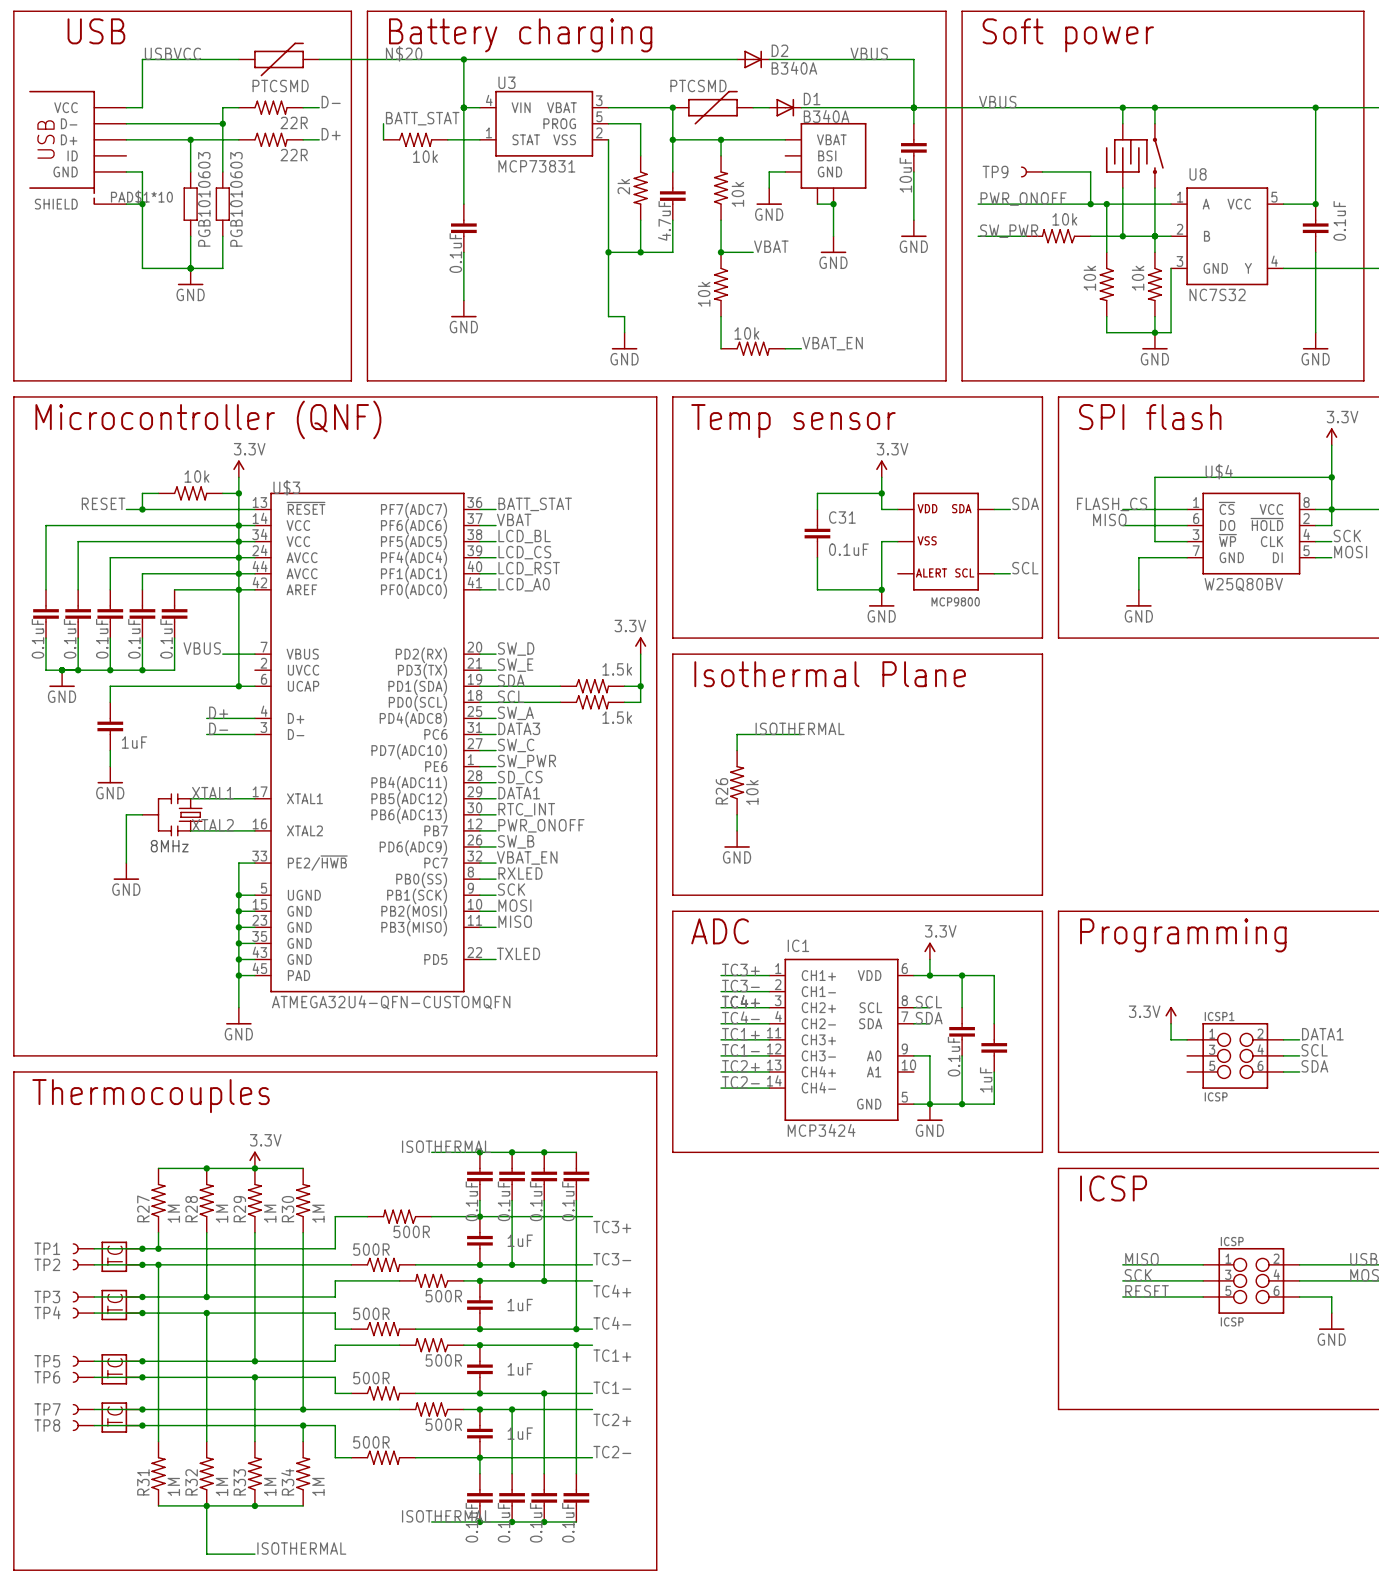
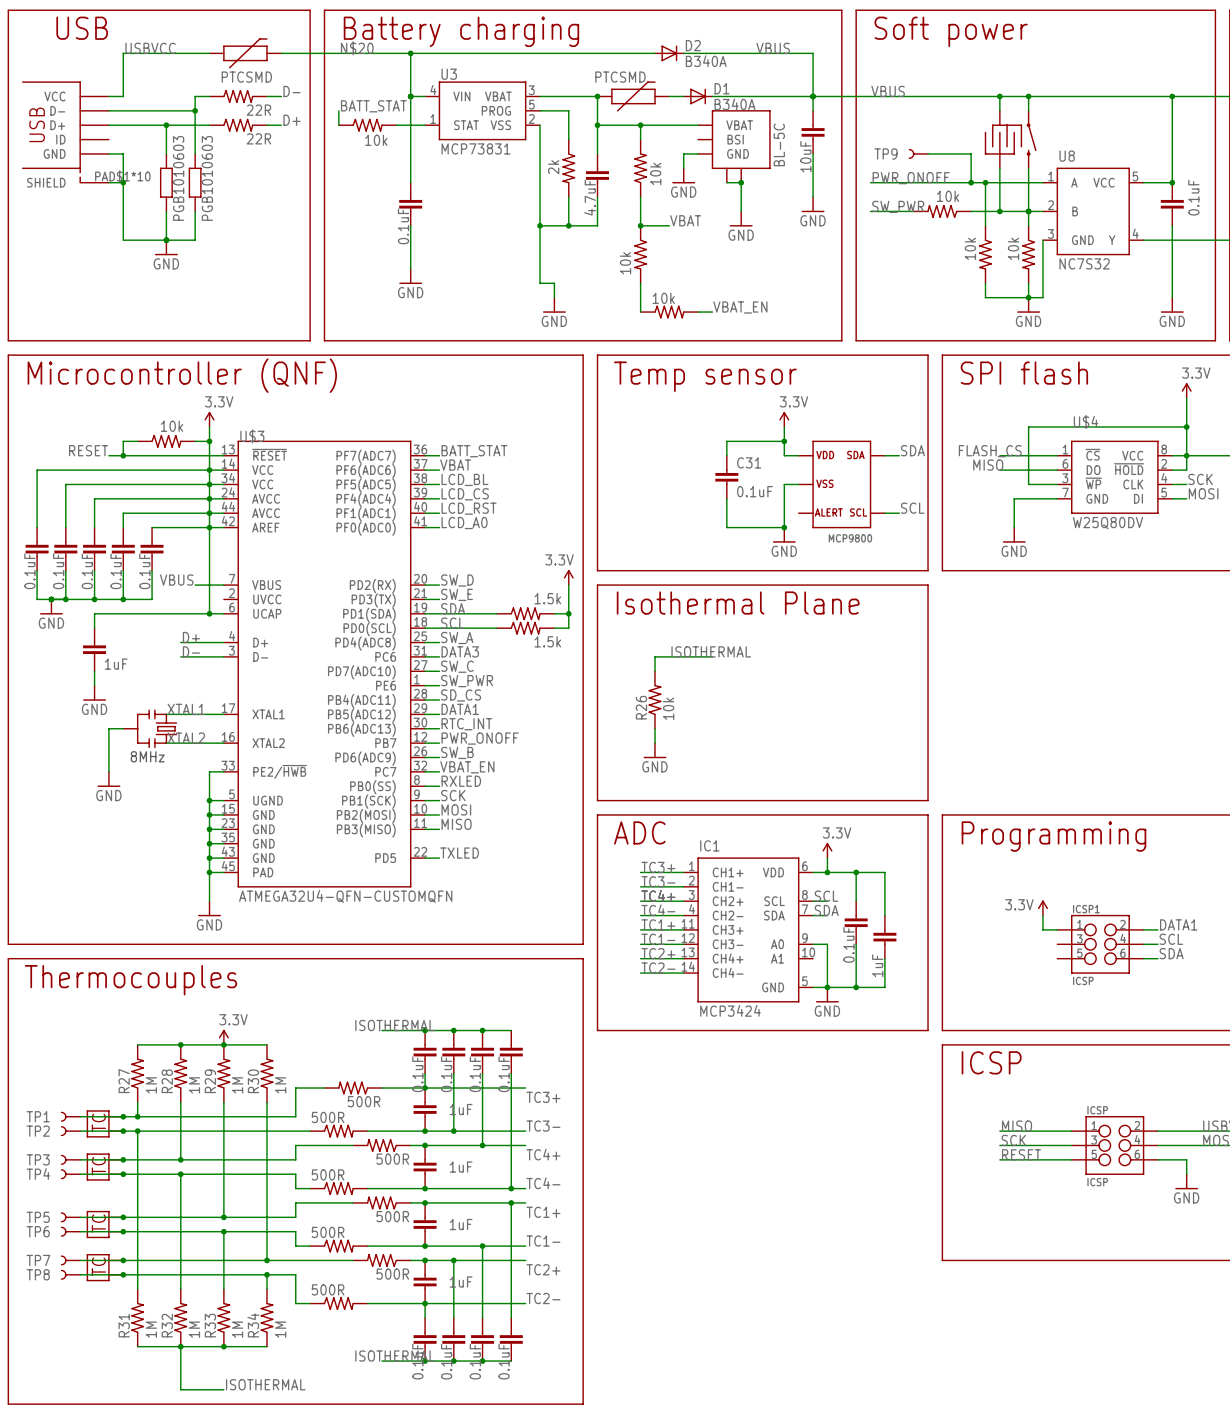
part: none -> (779, 144)
U$4 value: W25Q80BV (1243, 584) -> W25Q80DV (1108, 523)

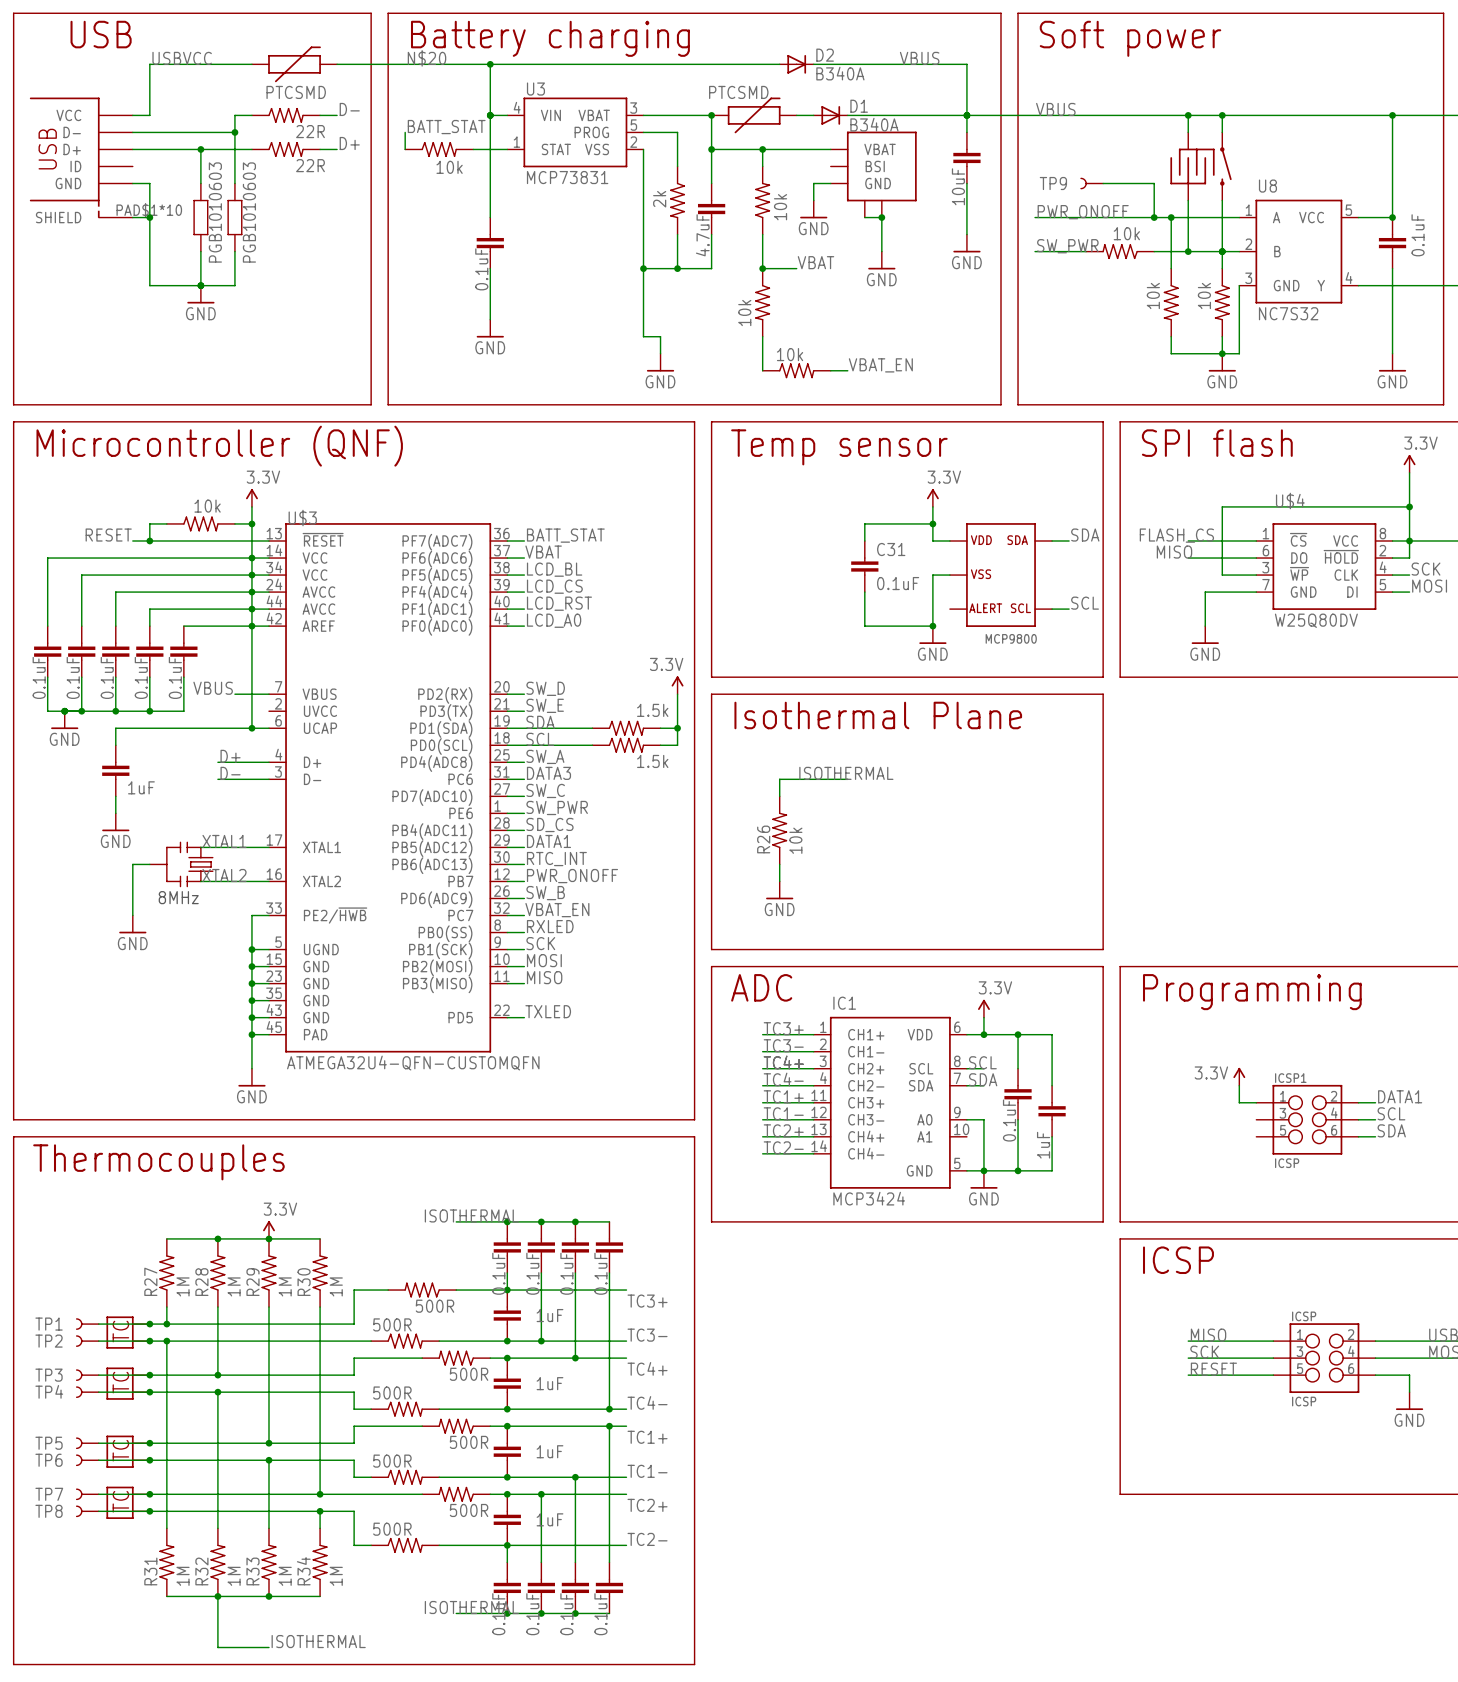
part: (779, 144) -> none

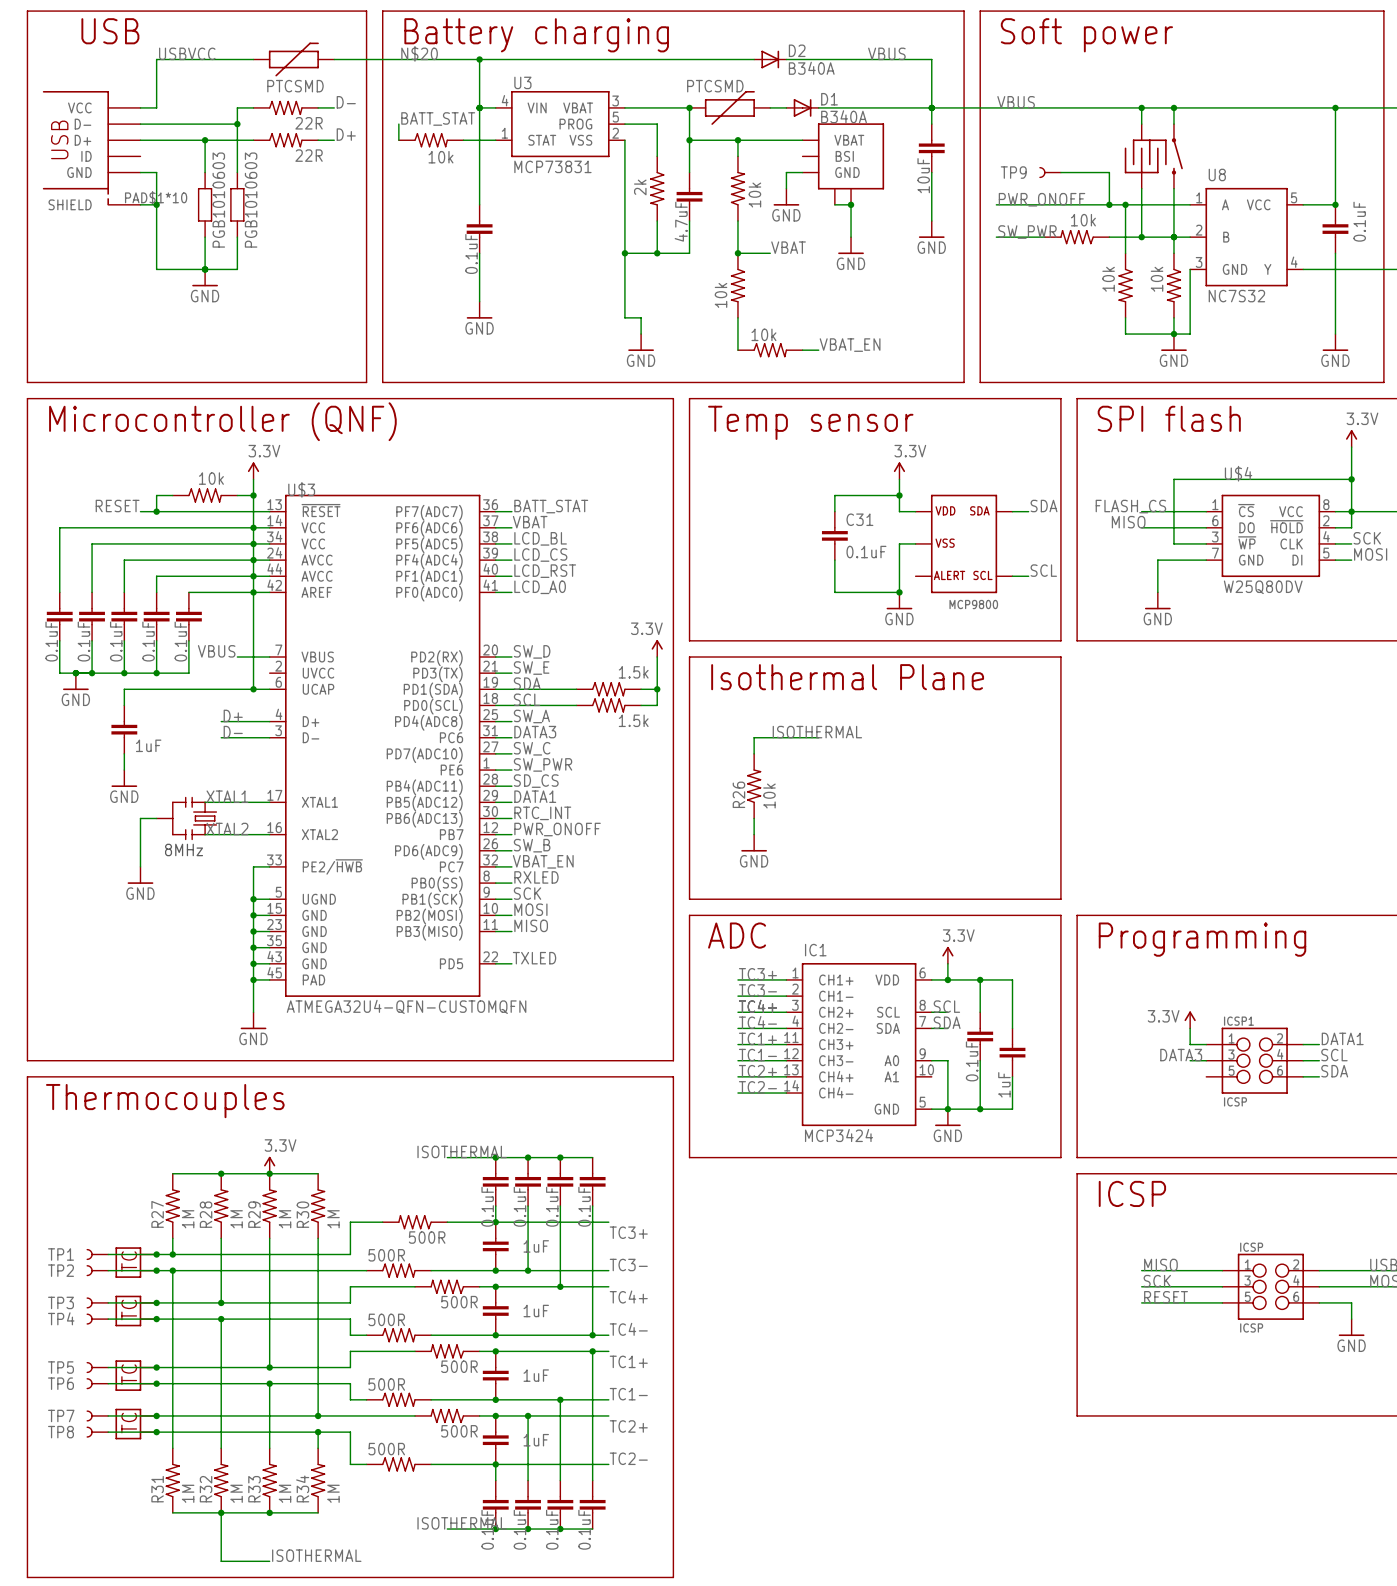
label: none -> DATA3 (1181, 1055)
wire: none -> (1190, 1060) (1206, 1060)

